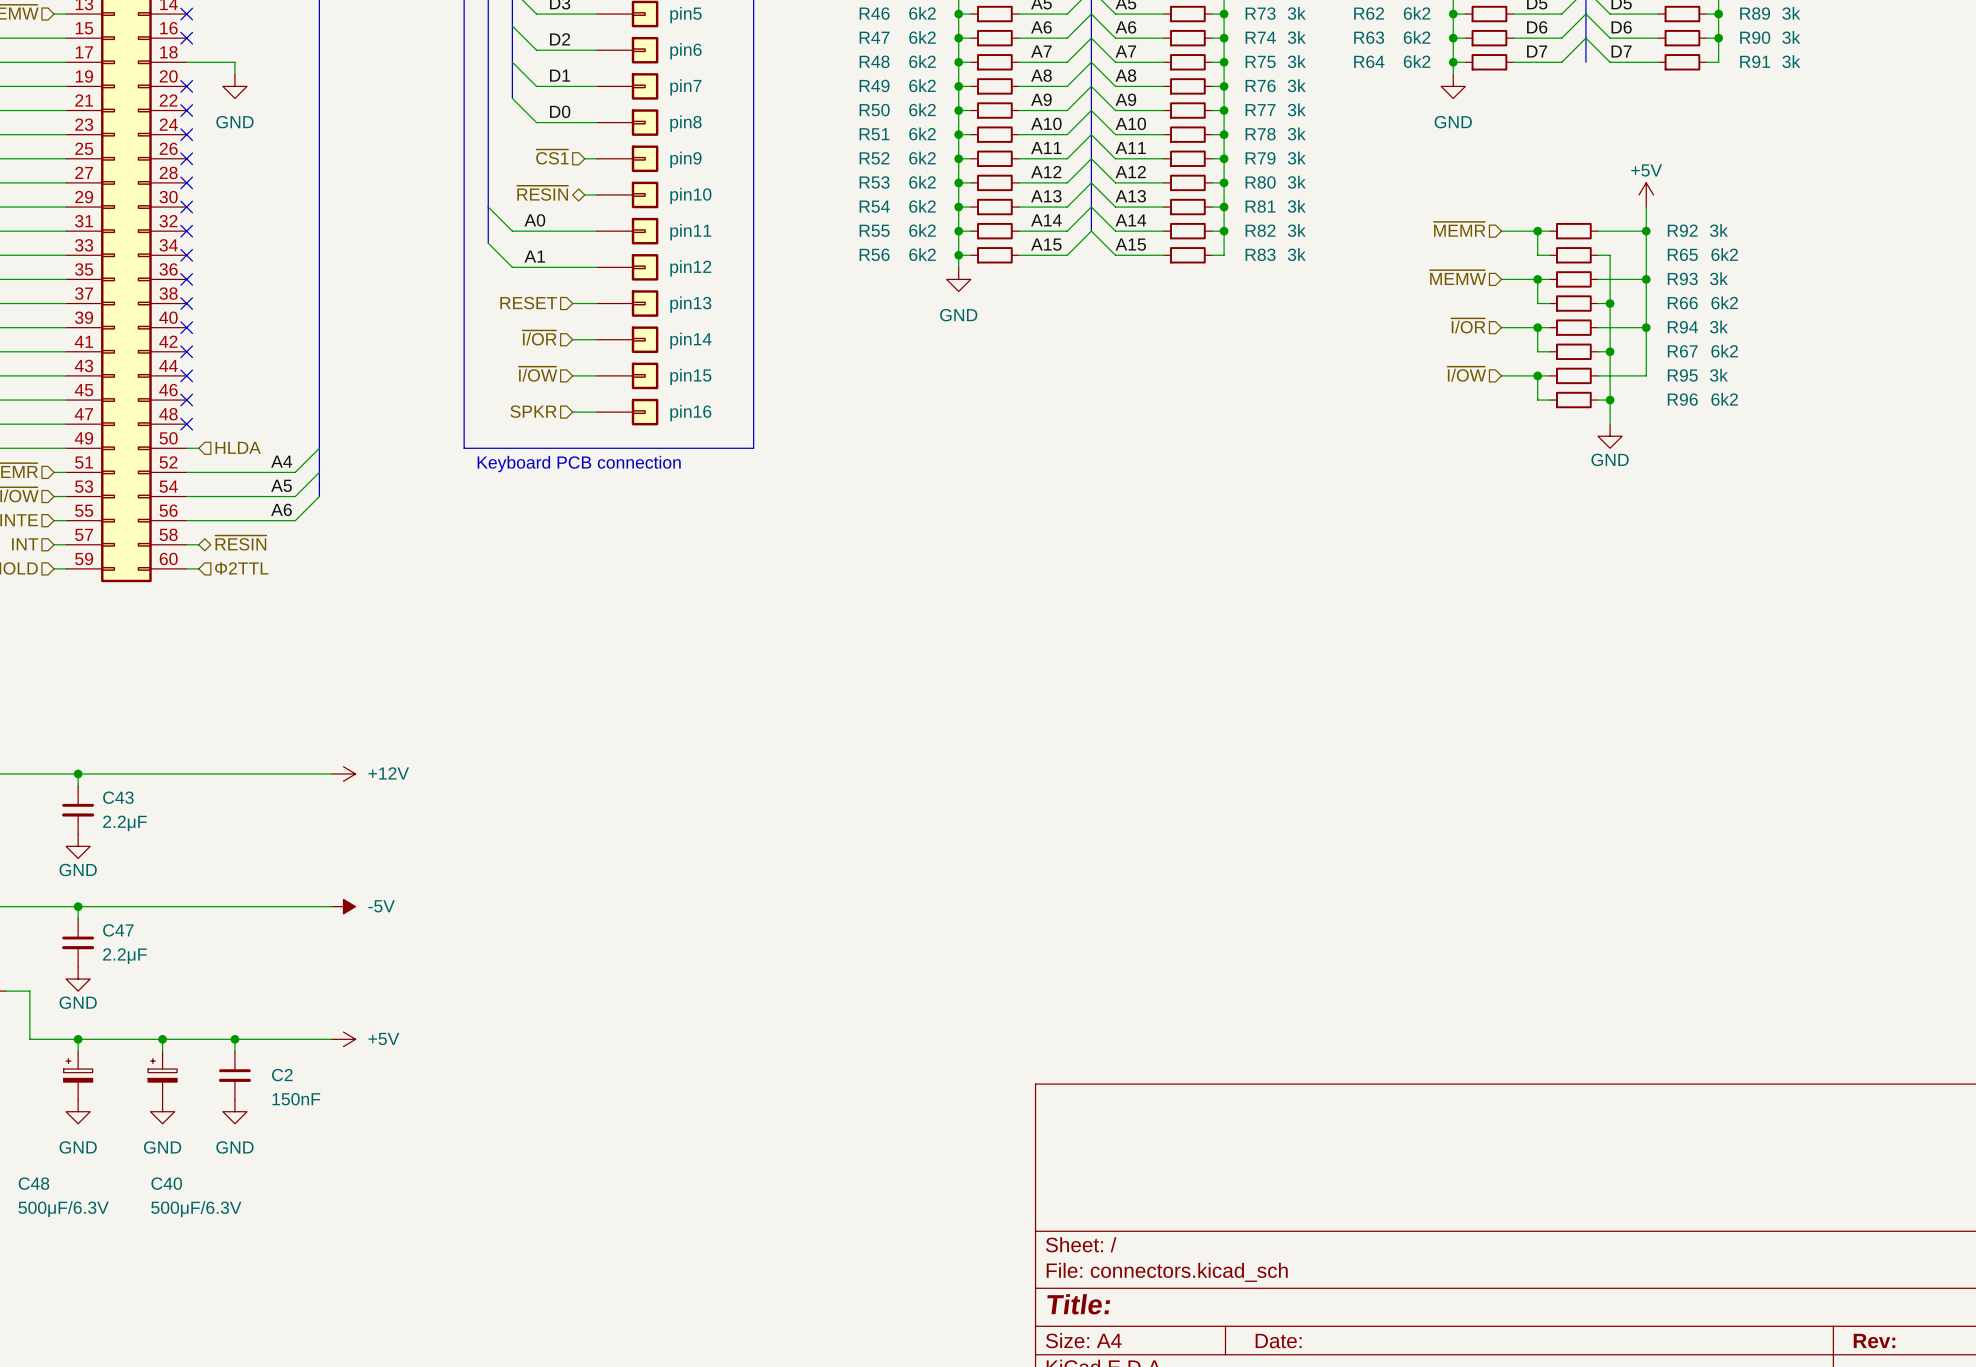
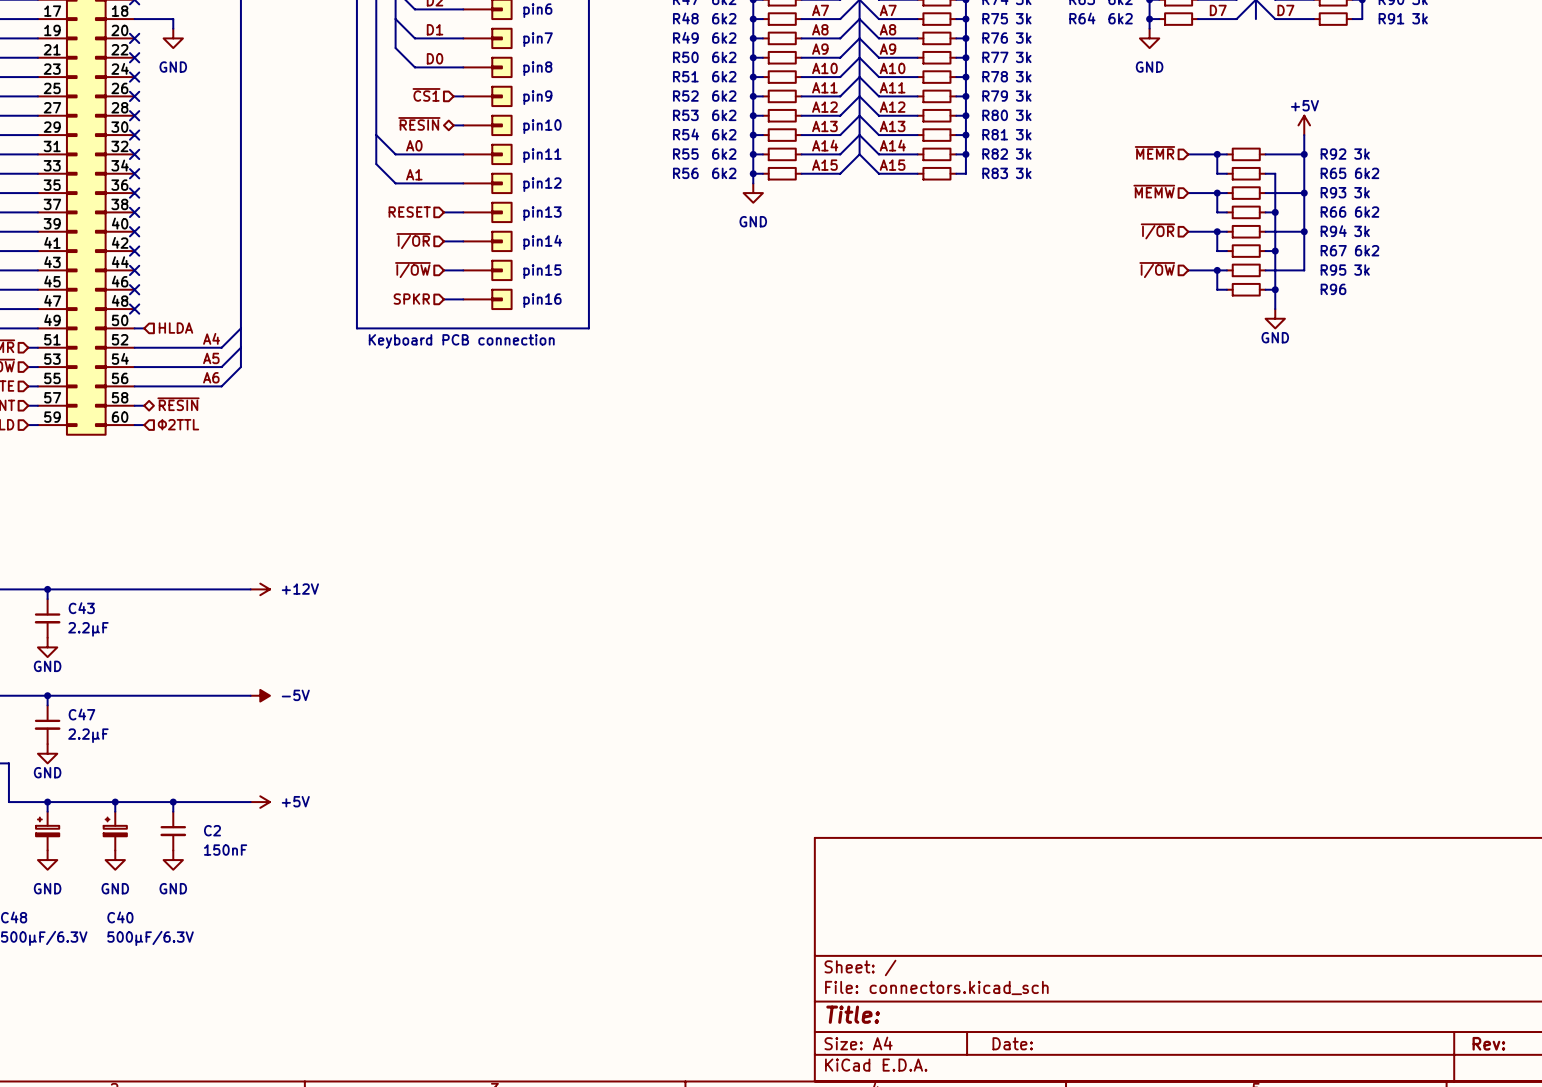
R96 value: 6k2 (1724, 399) -> none

